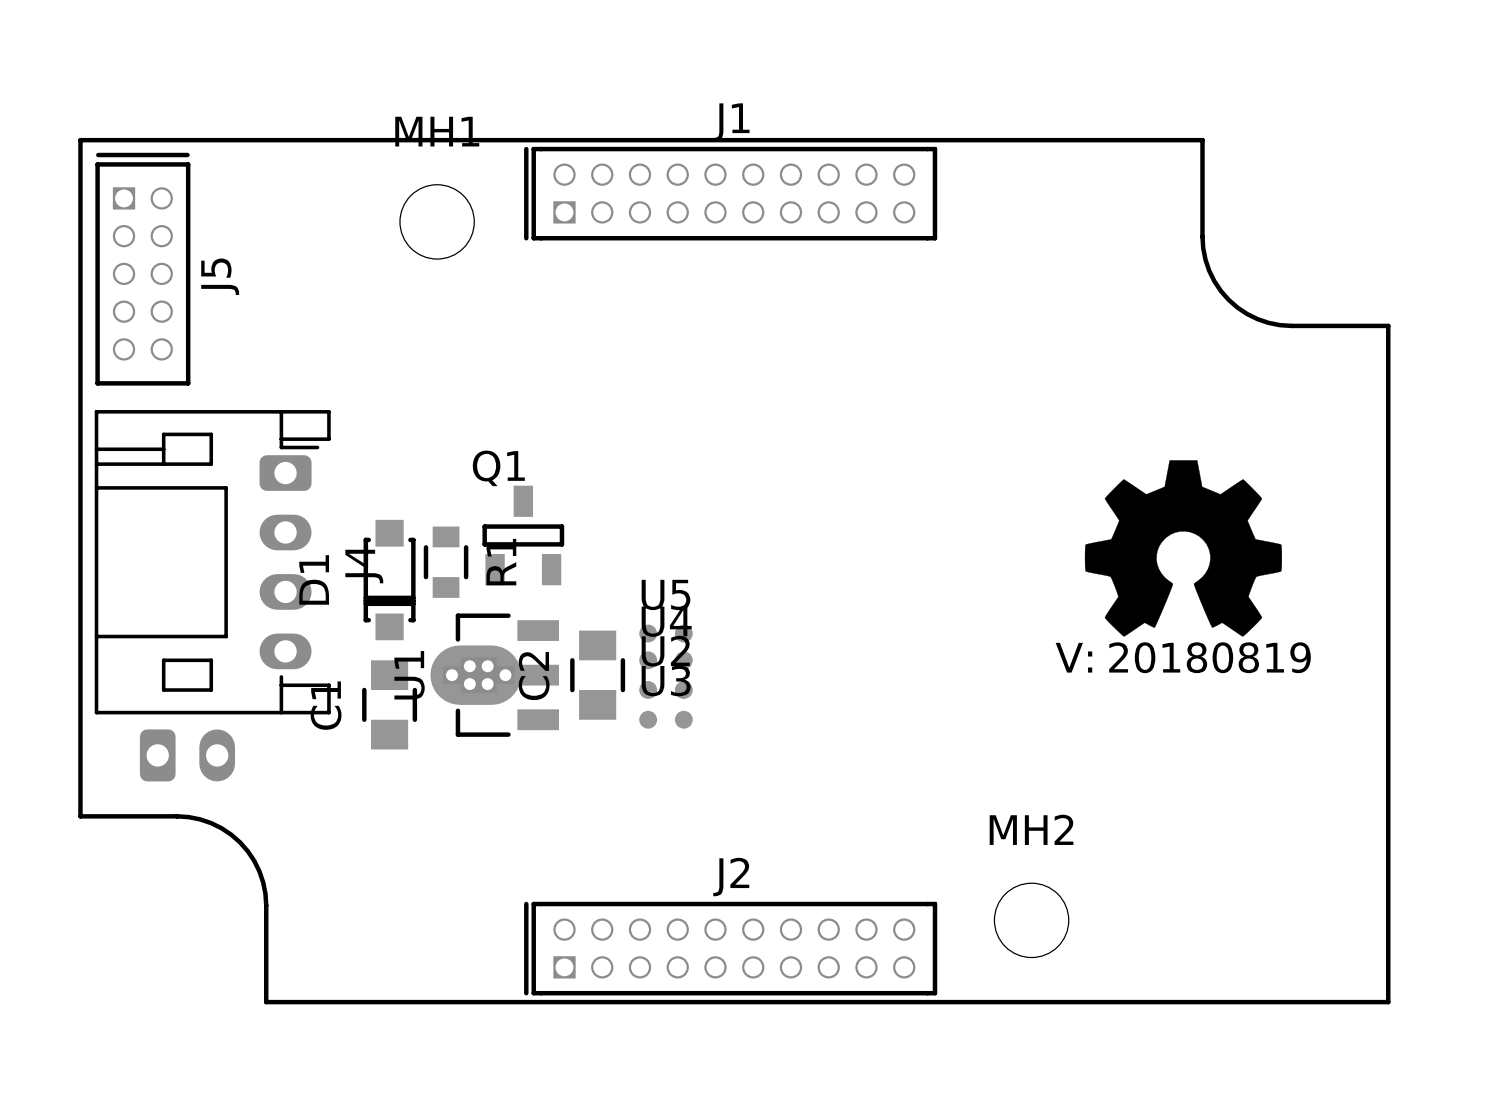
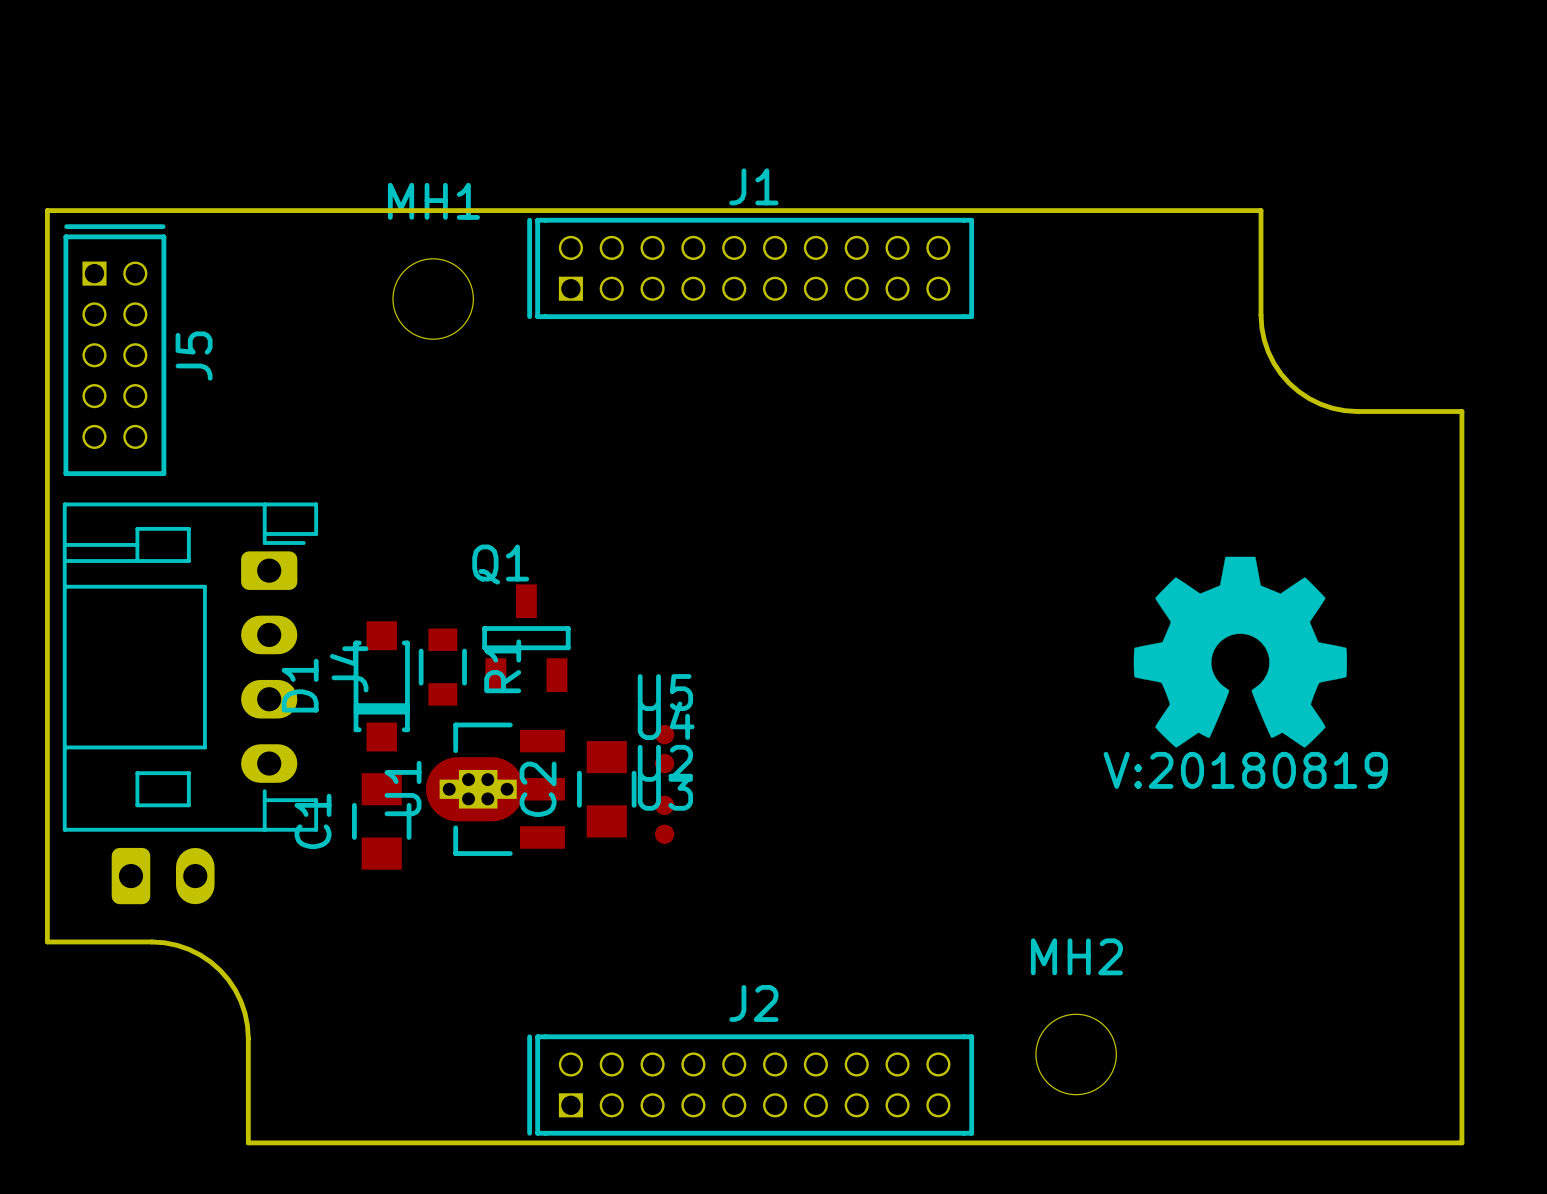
U5 footprint: [639, 624, 693, 643] -> [655, 724, 675, 745]
U4 footprint: [639, 651, 693, 670] -> [655, 753, 675, 774]
U2 footprint: [639, 681, 693, 699] -> [655, 795, 675, 815]
U3 footprint: [639, 710, 693, 729] -> [655, 824, 675, 844]

